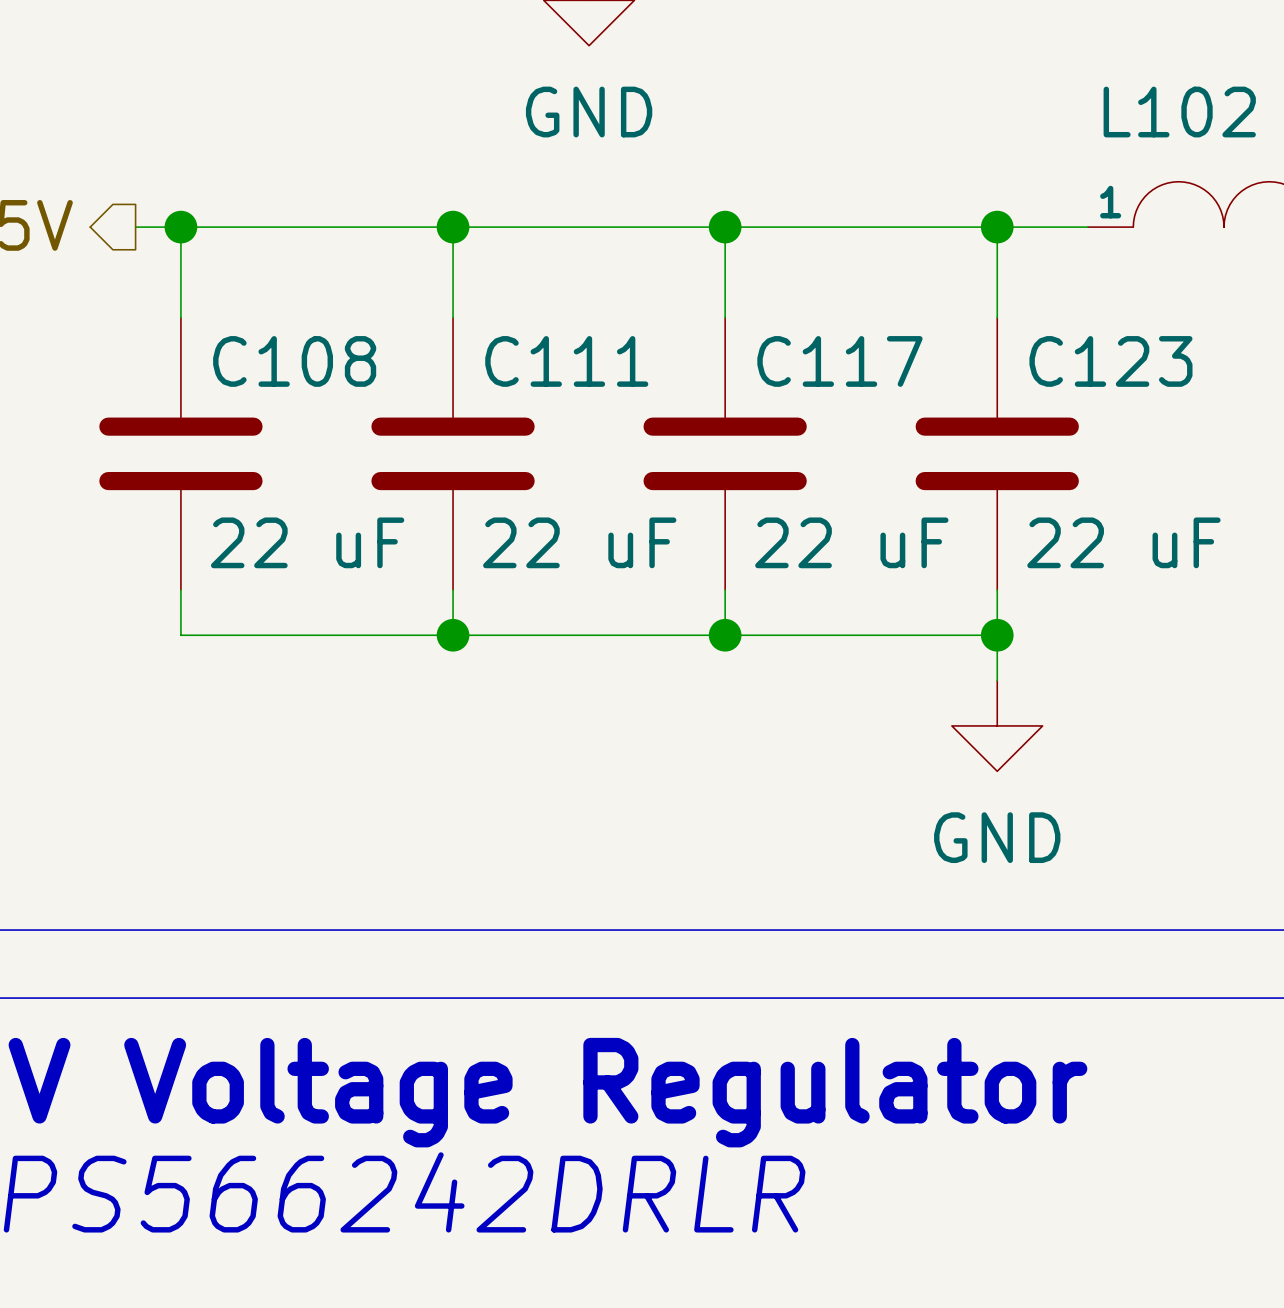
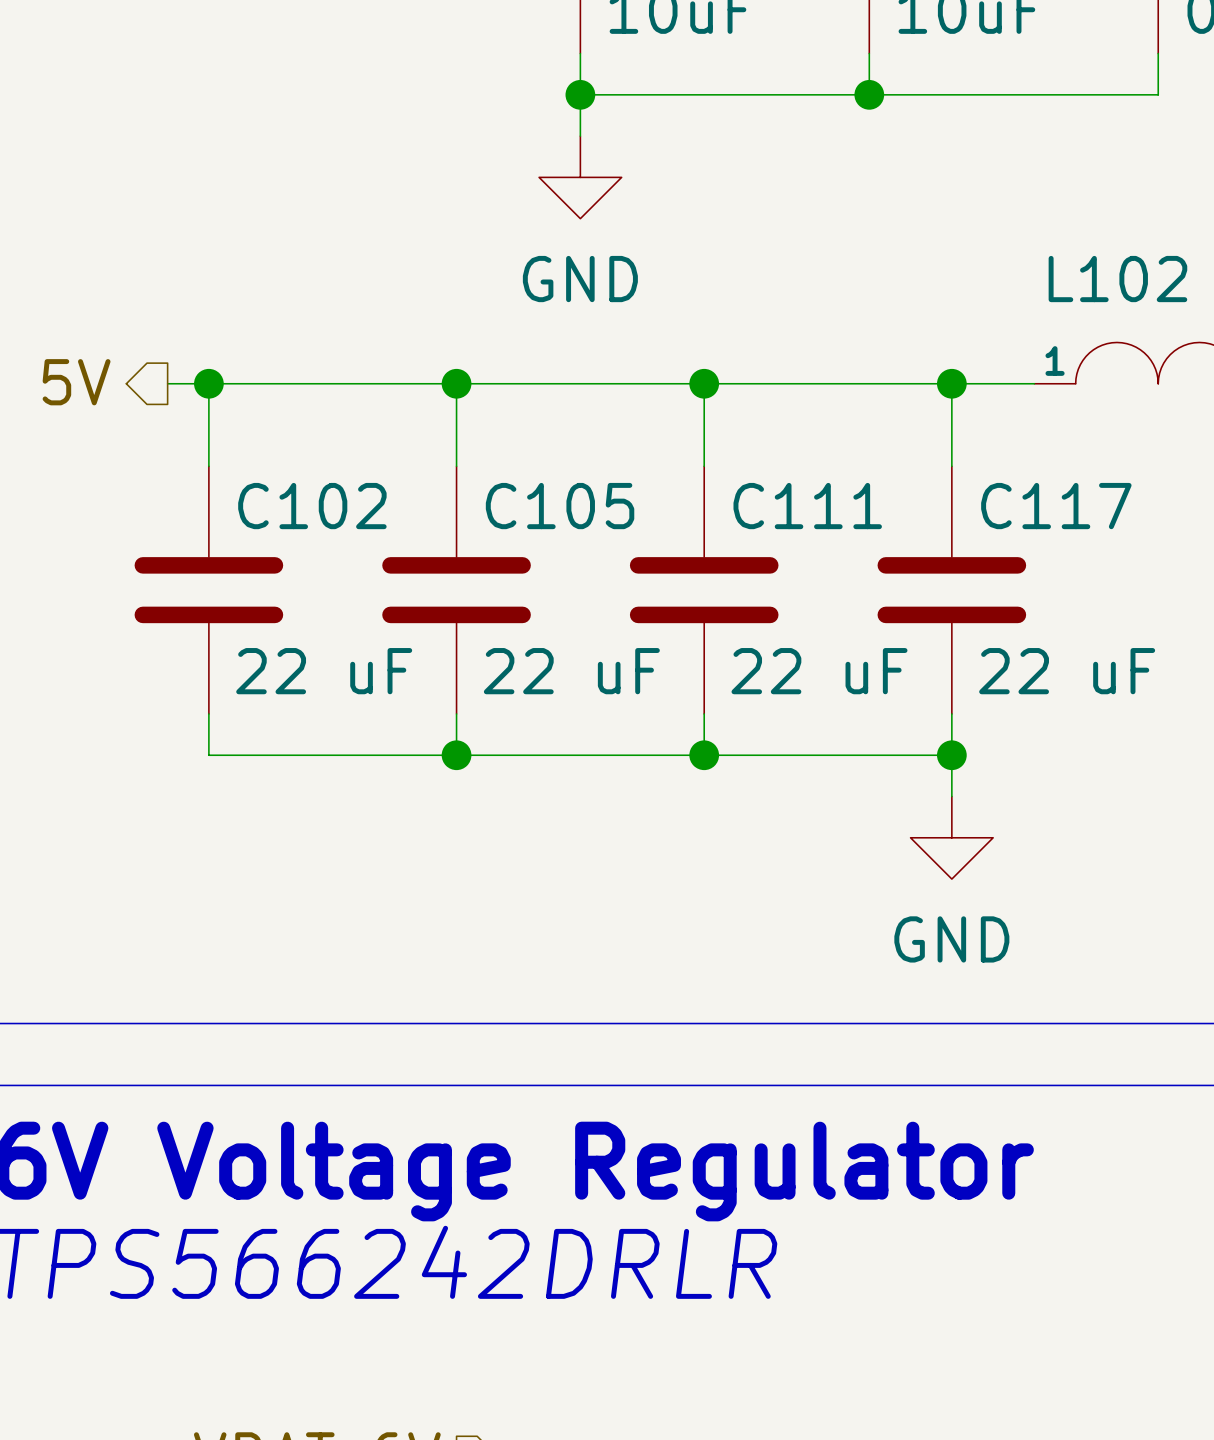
C108 name: C108 (294, 361) -> C102 (312, 506)
C111 name: C111 (566, 361) -> C105 (560, 506)
C117 name: C117 (839, 361) -> C111 (807, 506)
C123 name: C123 (1110, 361) -> C117 (1056, 506)

